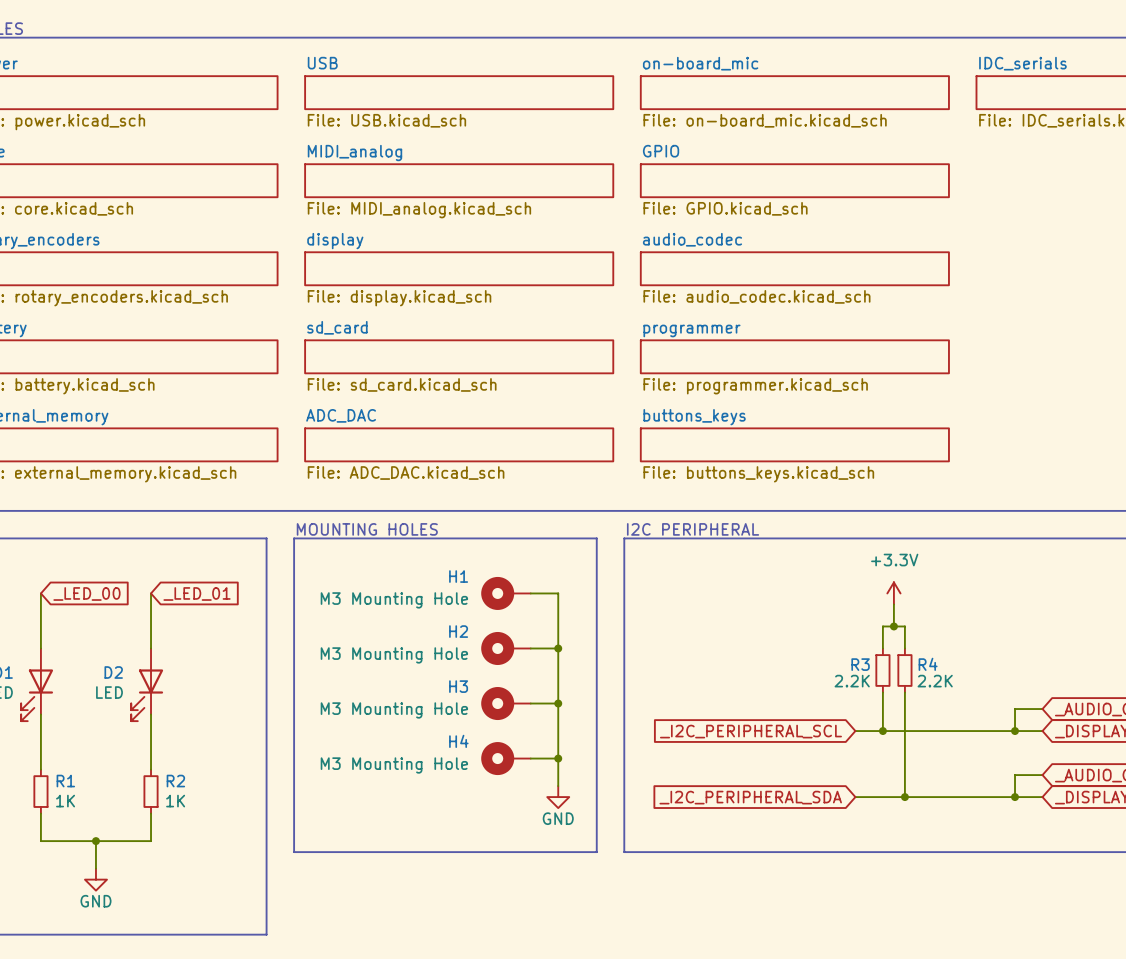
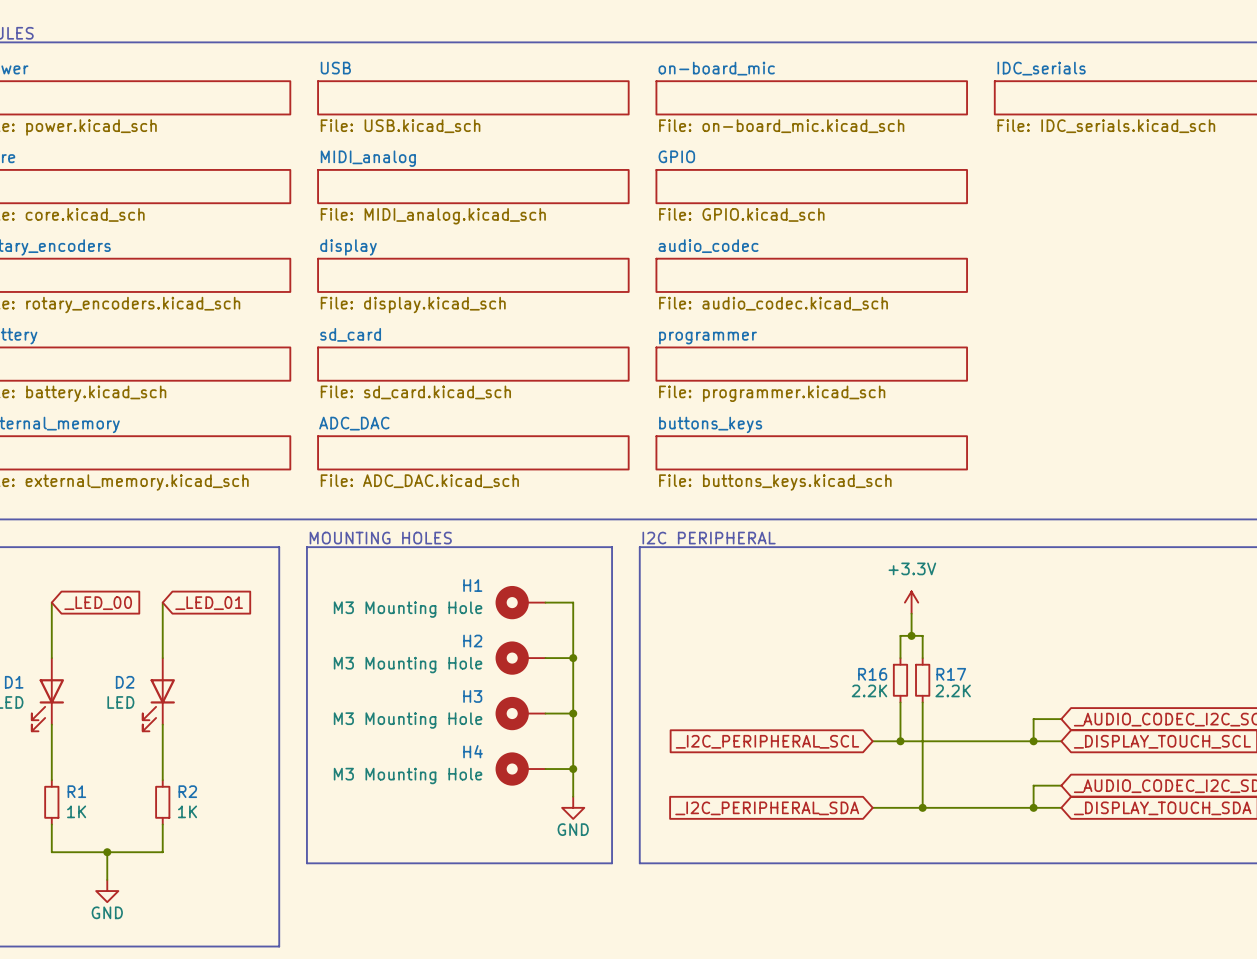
R3 name: R3 (860, 664) -> R16 (872, 674)
R4 name: R4 (928, 664) -> R17 (951, 674)

